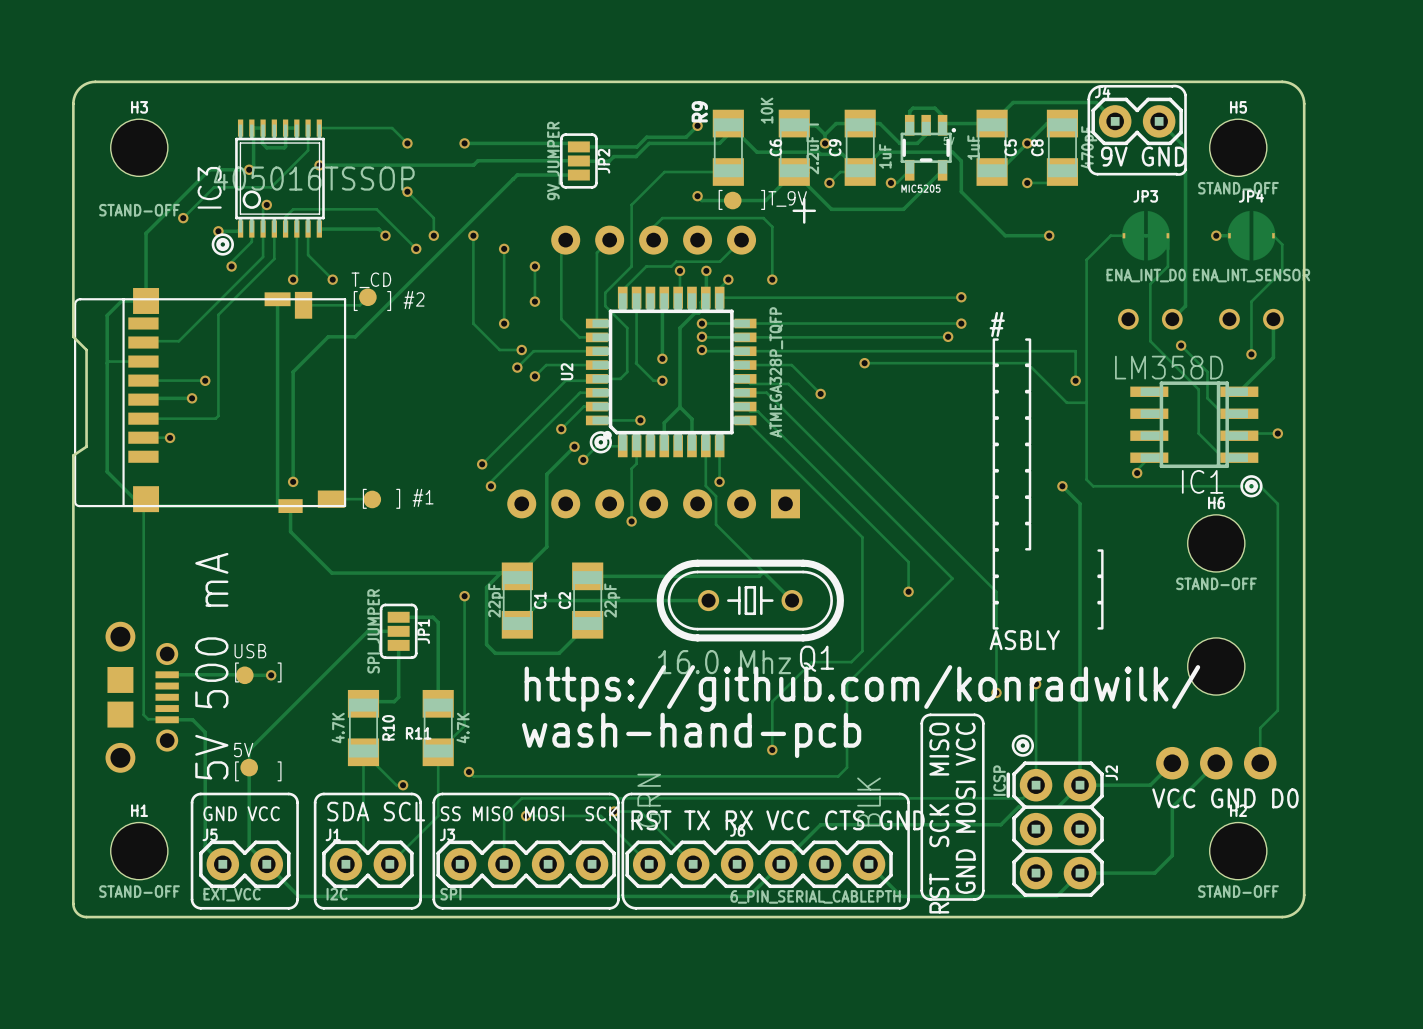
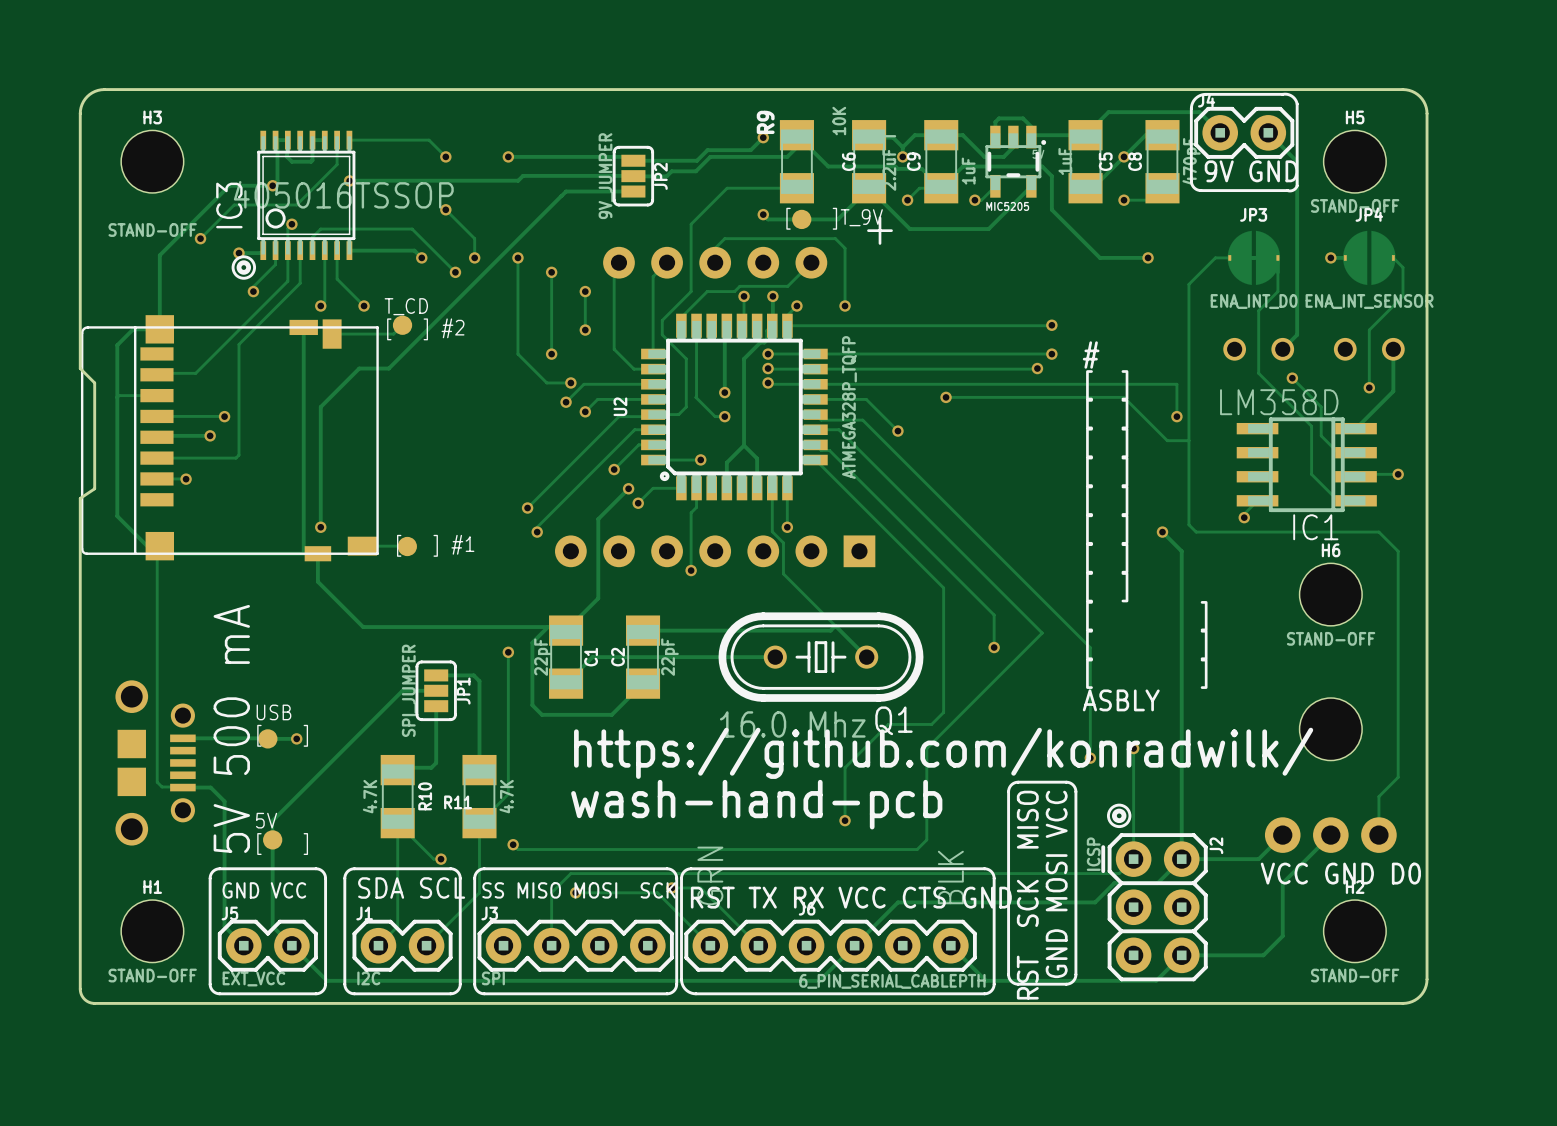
drawing: [589, 431, 613, 454] -> none
drawing: [1240, 475, 1263, 498] -> none

